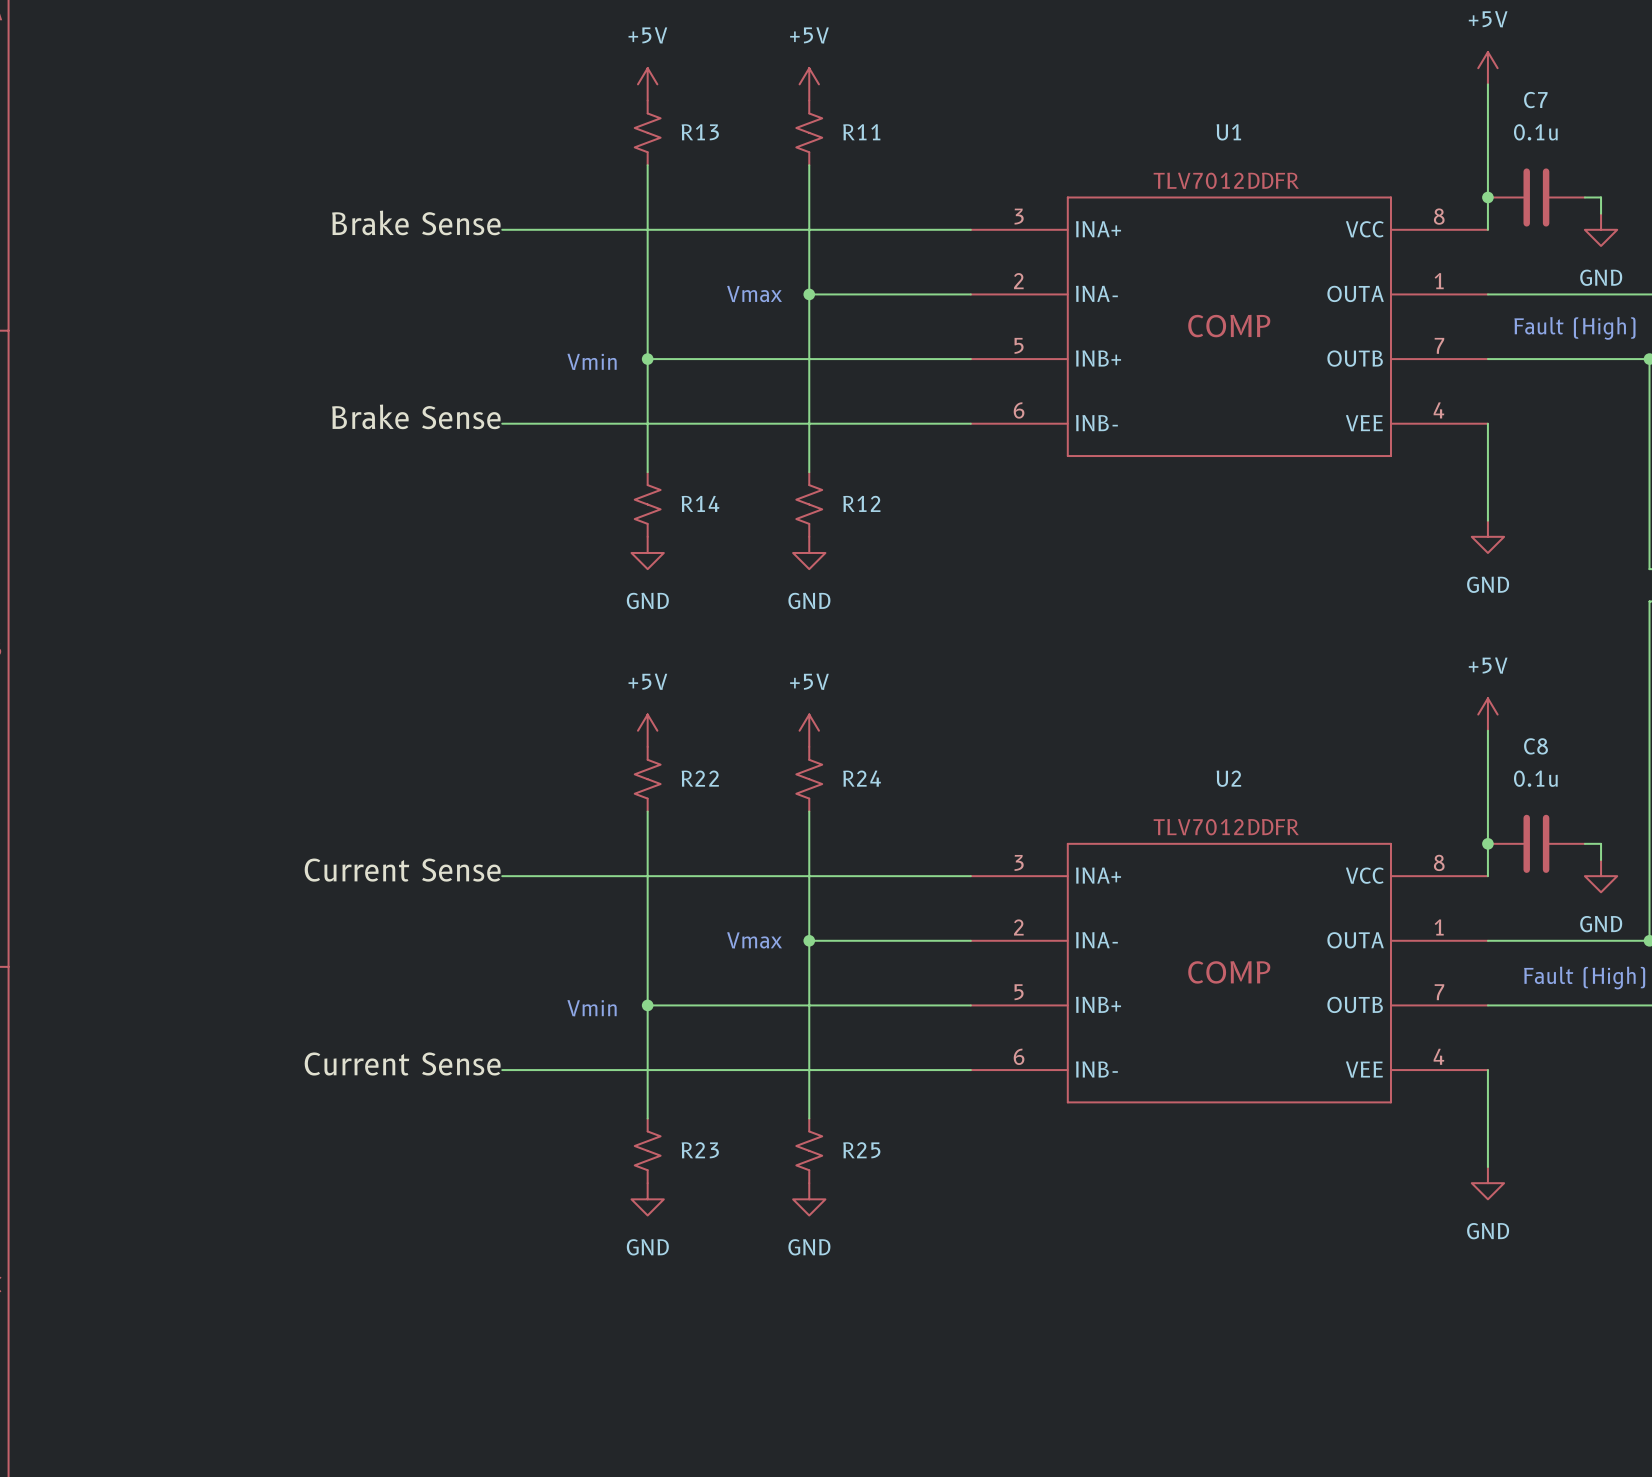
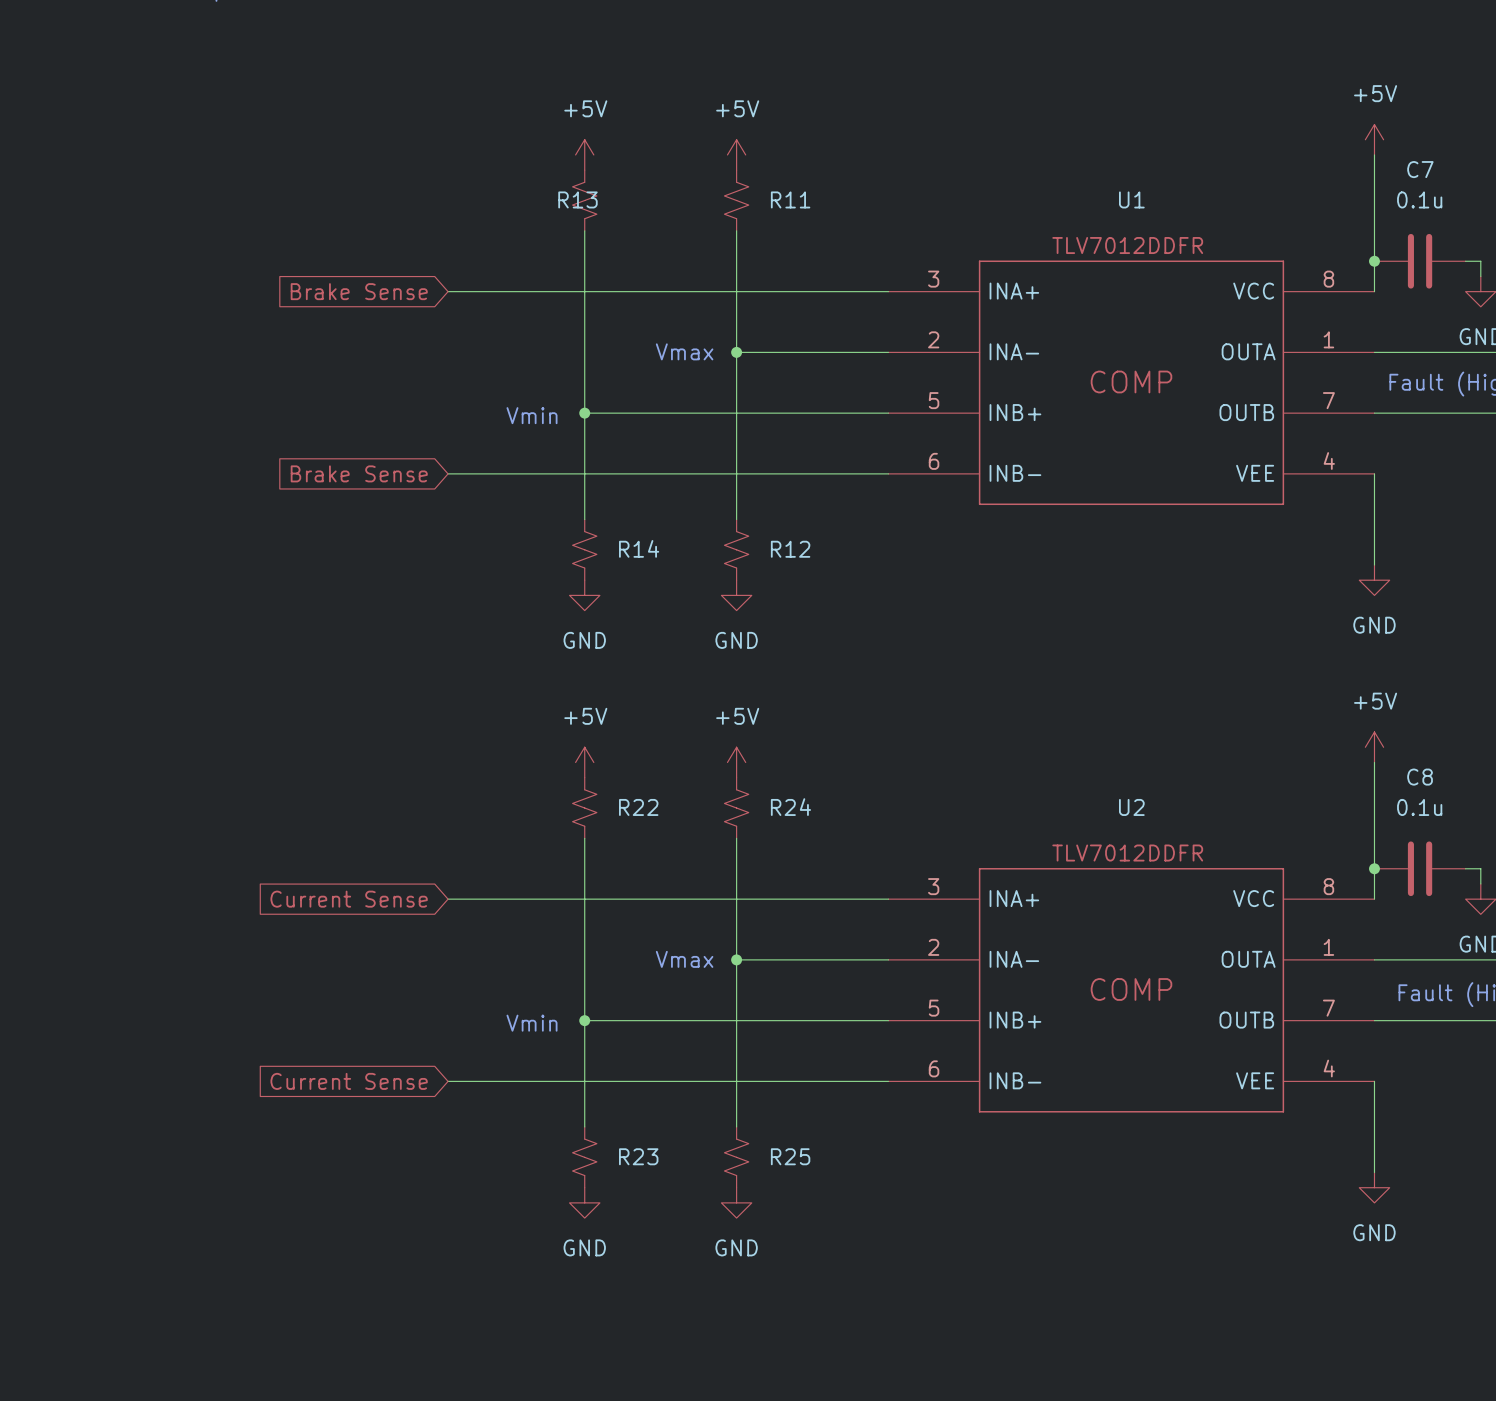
R13 flip: as is (647, 132) -> left-right (584, 200)
R13 name position: R13 (700, 132) -> R13 (577, 199)
label: Brake Sense (416, 222) -> none
global label: none -> Brake Sense (359, 291)
label: Brake Sense (416, 416) -> none
global label: none -> Brake Sense (359, 473)
label: Current Sense (402, 870) -> none
global label: none -> Current Sense (349, 899)
label: Current Sense (402, 1063) -> none
global label: none -> Current Sense (349, 1081)

